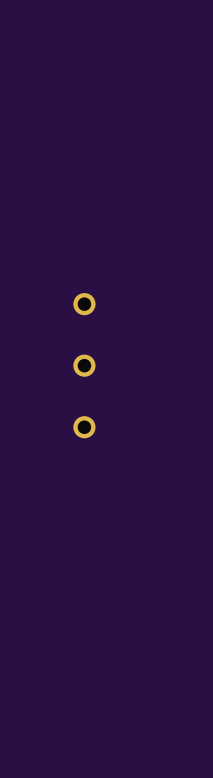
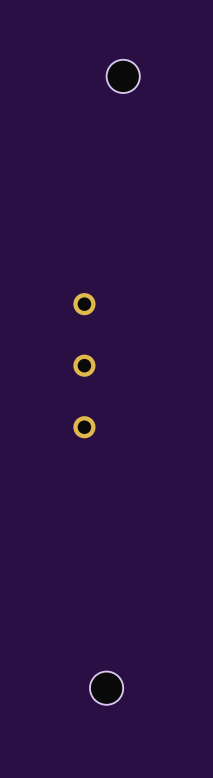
part: none -> (123, 76)
part: none -> (106, 688)

